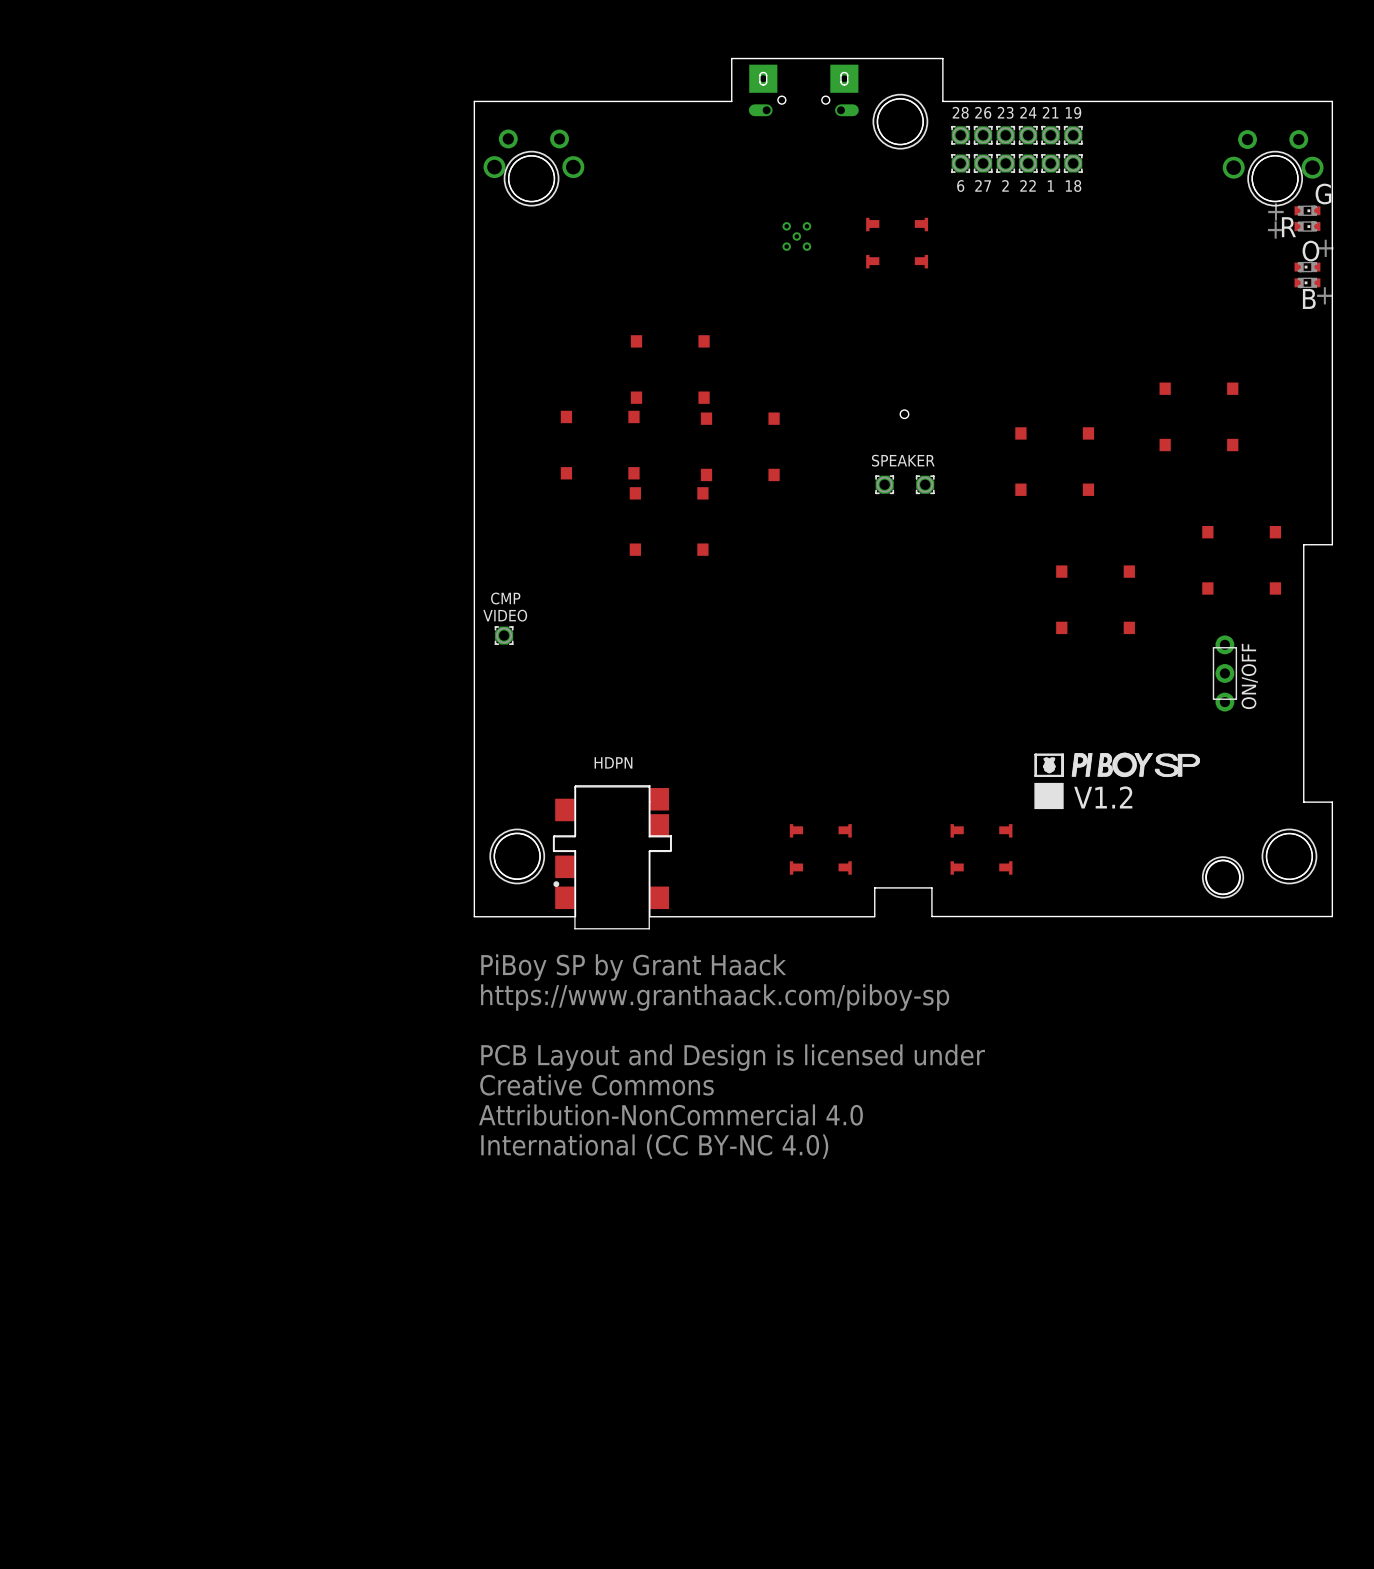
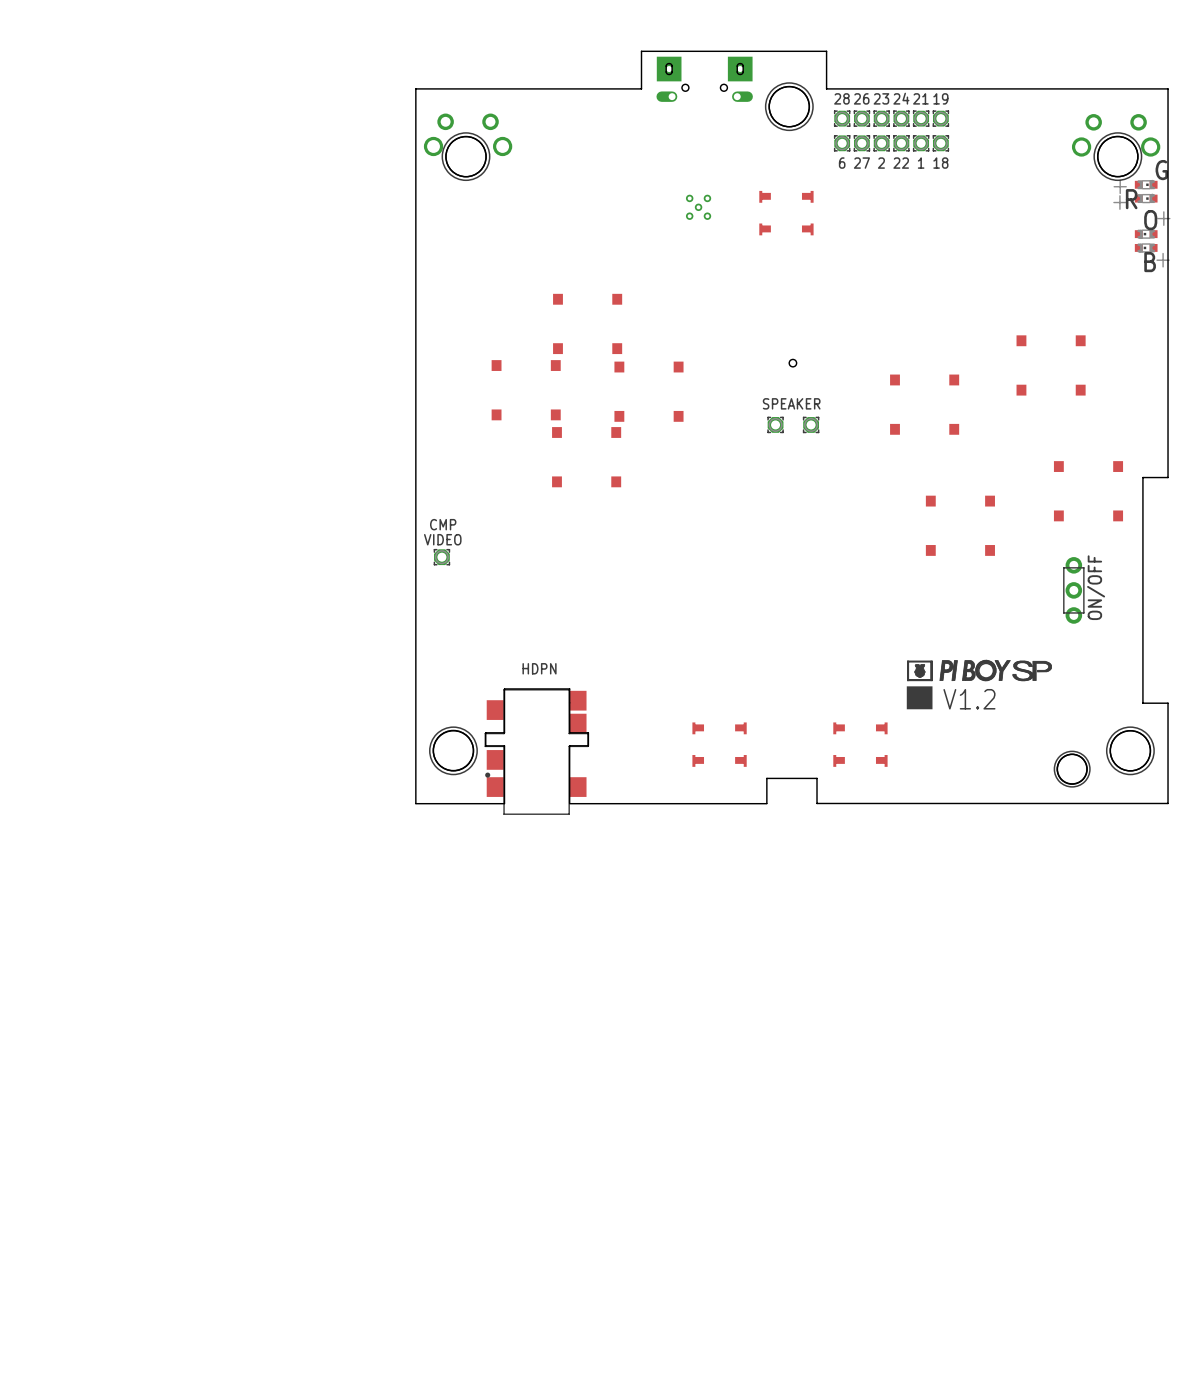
text: PiBoy SP by Grant Haack (633, 967) -> none
text: https://www.granthaack.com/piboy-sp (715, 997) -> none
text: PCB Layout and Design is licensed under (733, 1057) -> none
text: Creative Commons (597, 1084) -> none
text: Attribution-NonCommercial 4.0 (670, 1115) -> none
text: International (CC BY-NC 4.0) (654, 1146) -> none

